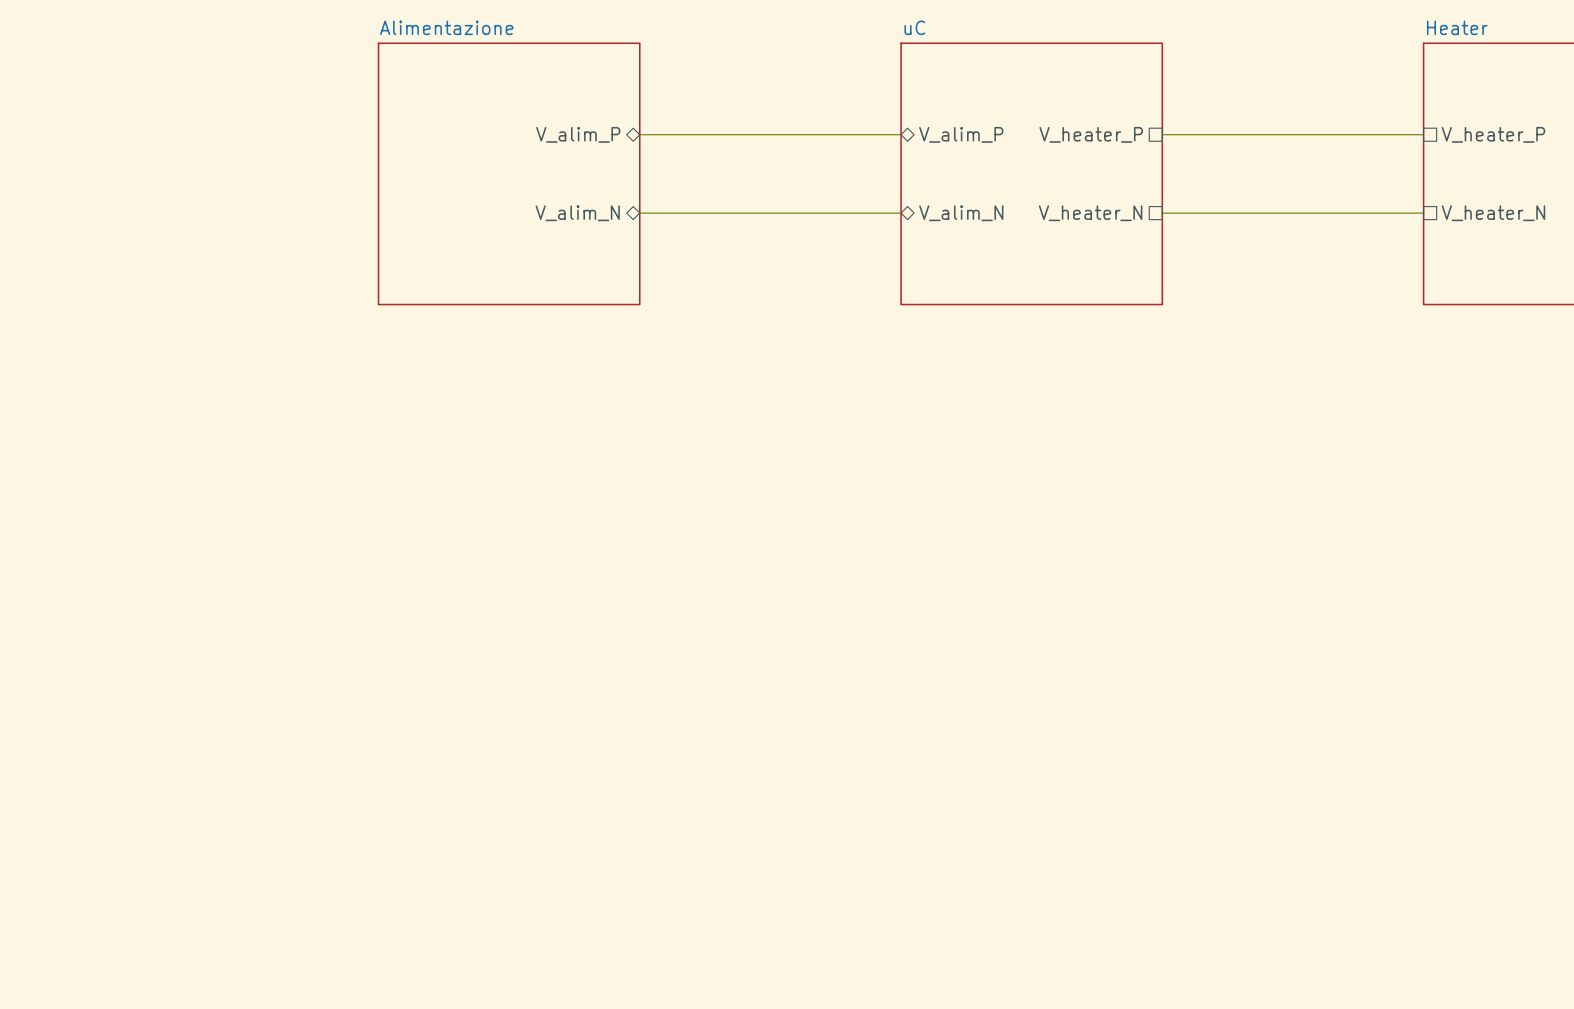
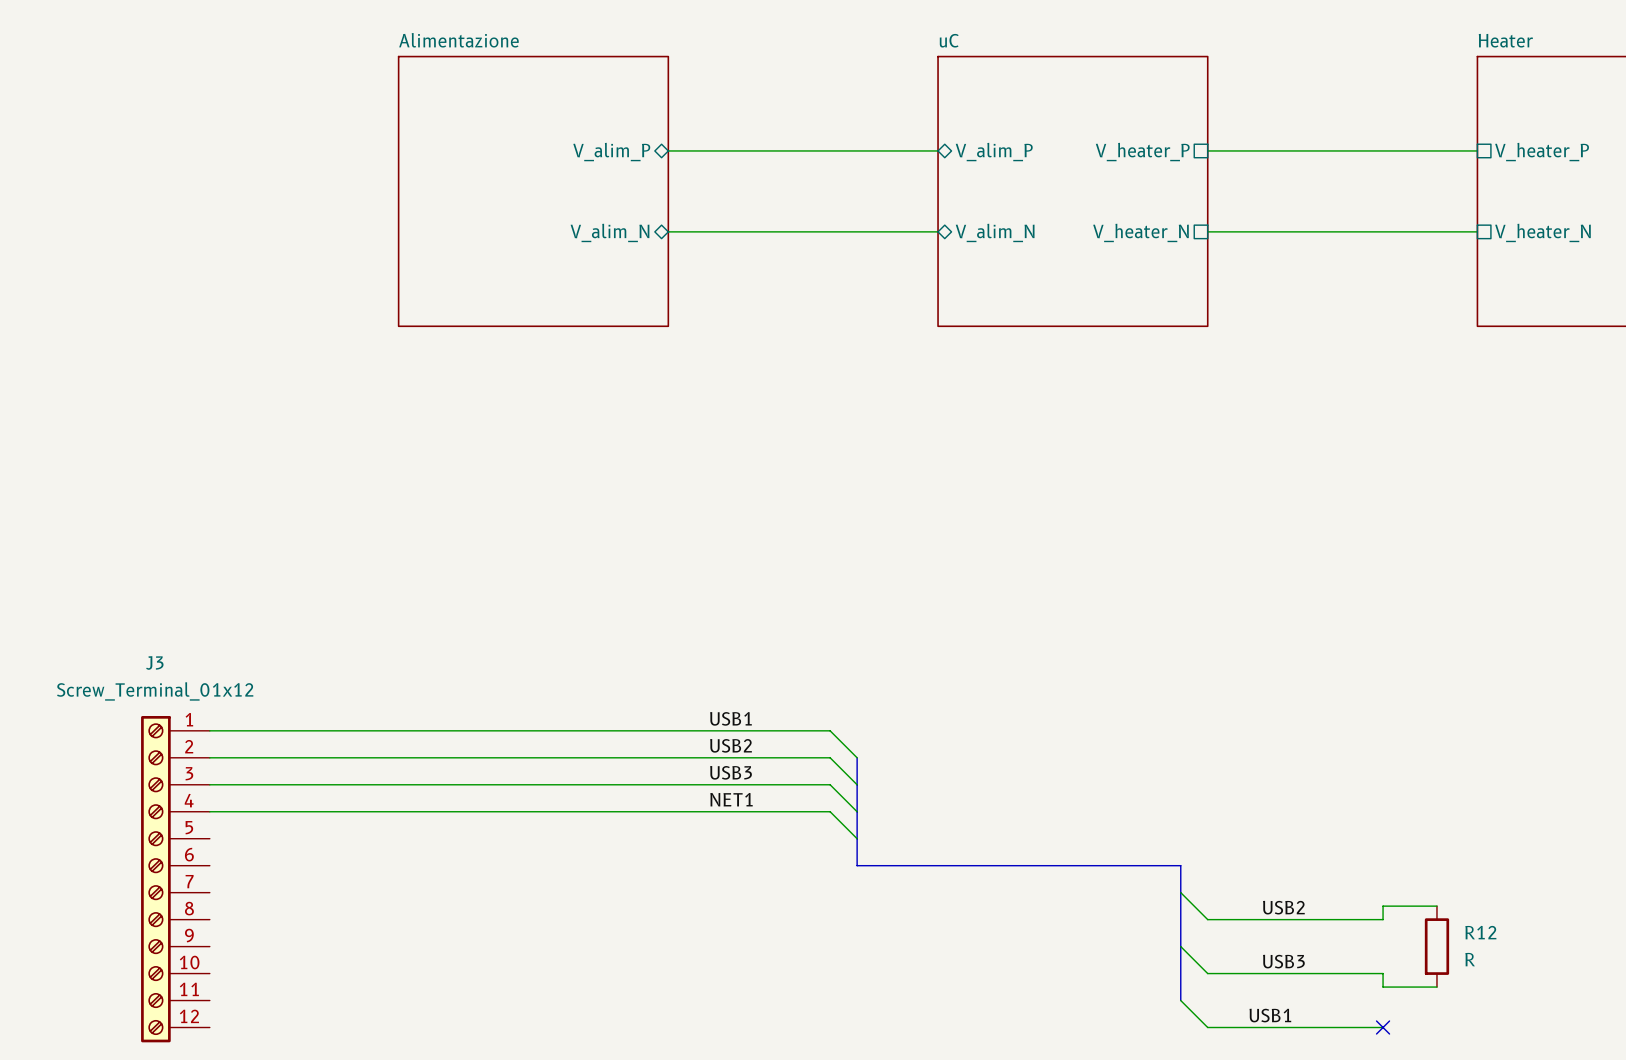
label: none -> USB1 (730, 718)
wire: none -> (209, 730) (830, 730) (857, 757)
label: none -> USB2 (730, 745)
wire: none -> (209, 757) (830, 757) (857, 784)
bus: none -> (857, 757) (857, 865) (1180, 865) (1180, 1000)
label: none -> USB3 (731, 772)
wire: none -> (209, 784) (830, 784) (857, 811)
label: none -> NET1 (731, 799)
wire: none -> (209, 811) (830, 811) (857, 838)
J3: none -> Screw_Terminal_01x12 (175, 879)
wire: none -> (1180, 892) (1207, 919) (1383, 919) (1383, 906) (1436, 906)
label: none -> USB2 (1283, 907)
wire: none -> (1180, 946) (1207, 973) (1383, 973) (1383, 987) (1436, 987)
R12: none -> R (1436, 946)
label: none -> USB3 (1283, 961)
wire: none -> (1180, 1000) (1207, 1027) (1383, 1027)
label: none -> USB1 (1270, 1015)
no-connect mark: none -> (1383, 1027)

